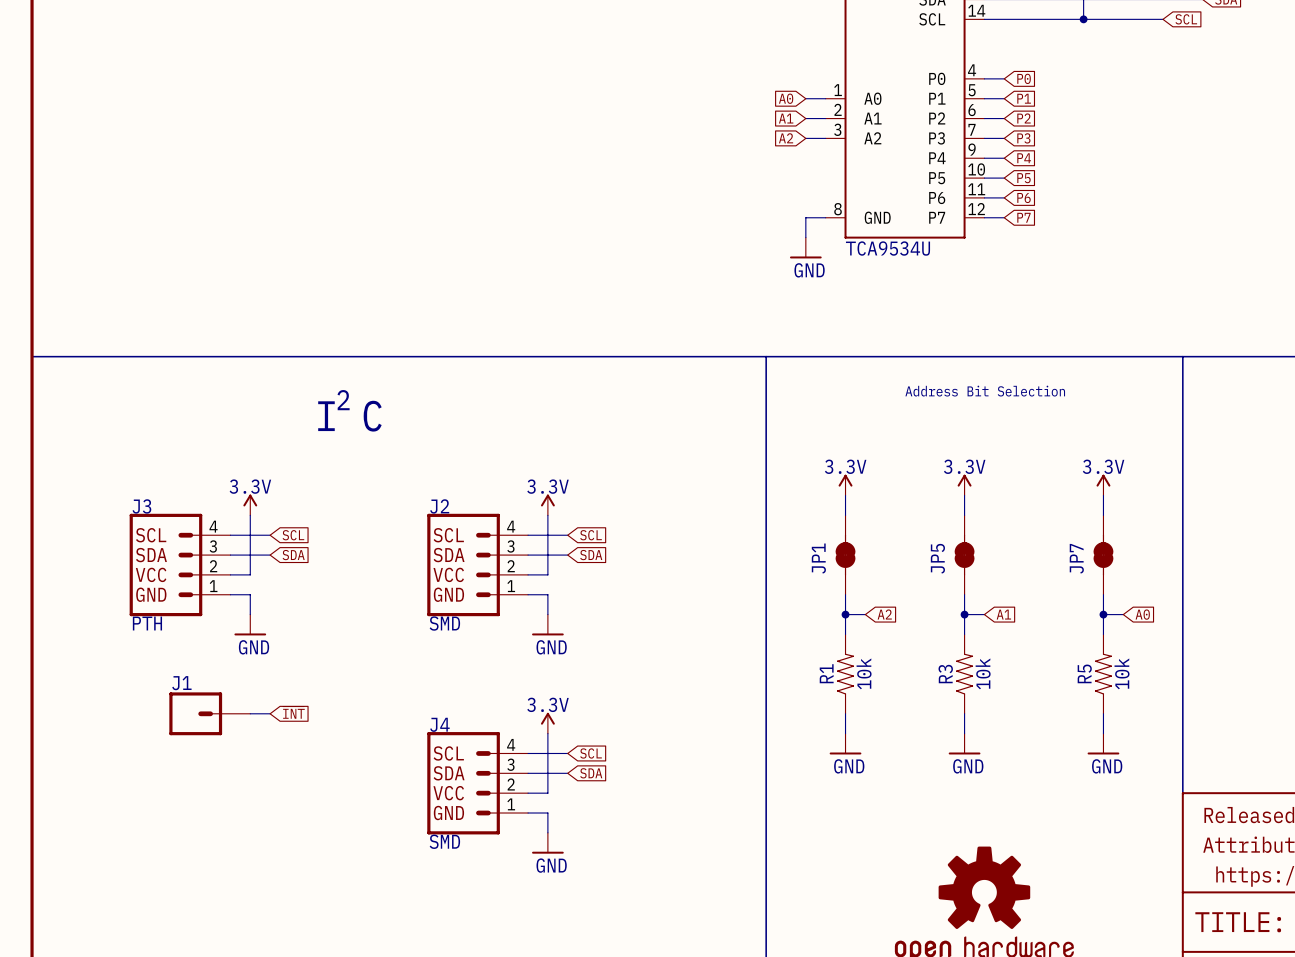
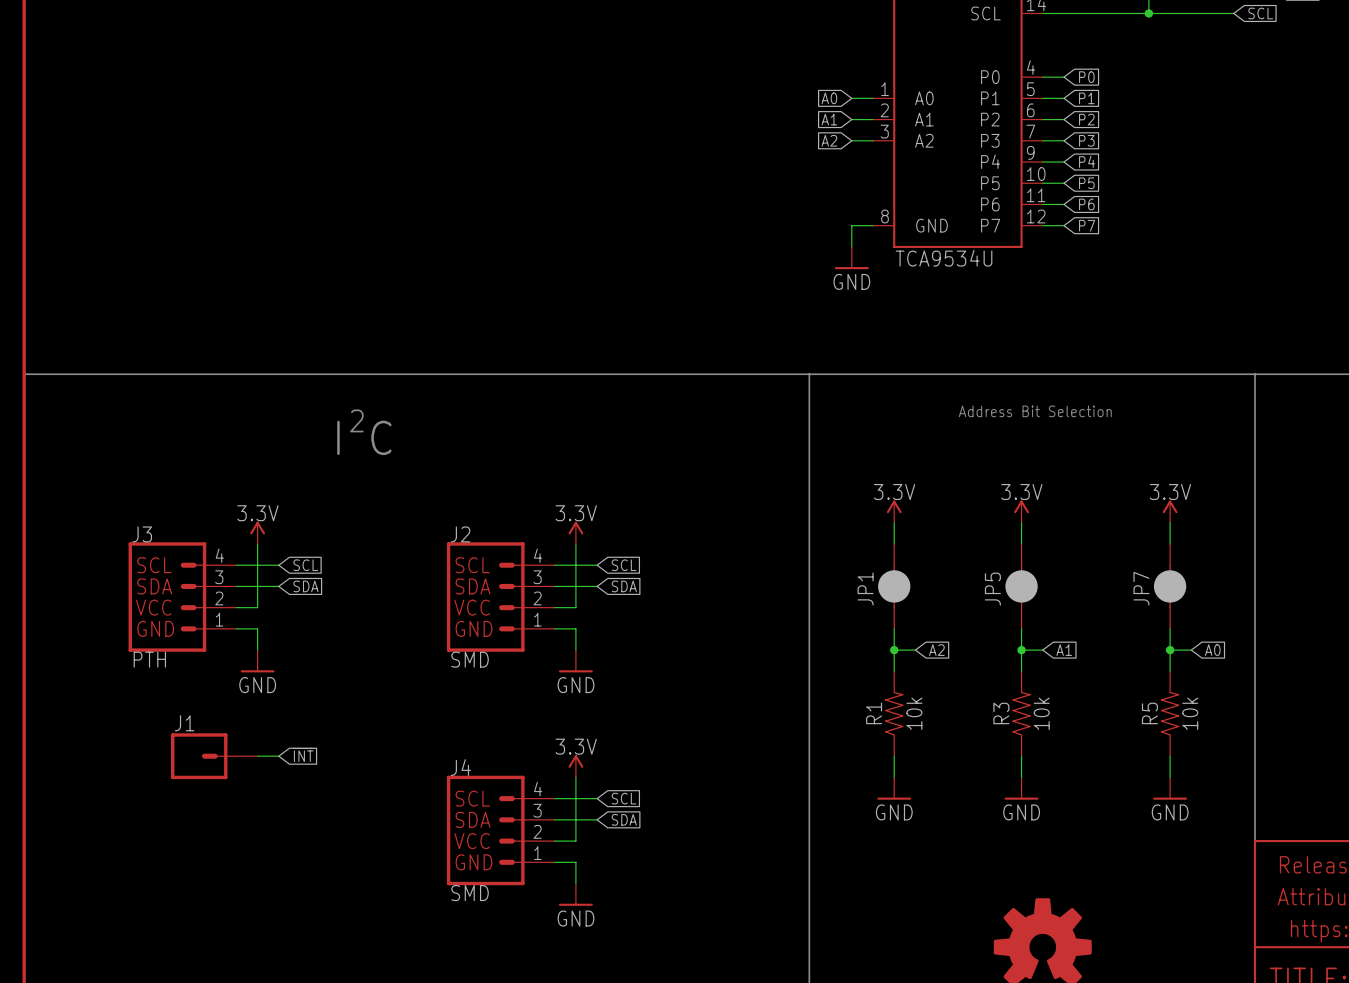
JP1 symbol: [835, 515, 856, 595] -> [878, 543, 911, 629]
JP5 symbol: [954, 515, 975, 595] -> [1005, 543, 1038, 629]
JP7 symbol: [1093, 515, 1114, 595] -> [1153, 543, 1187, 629]

